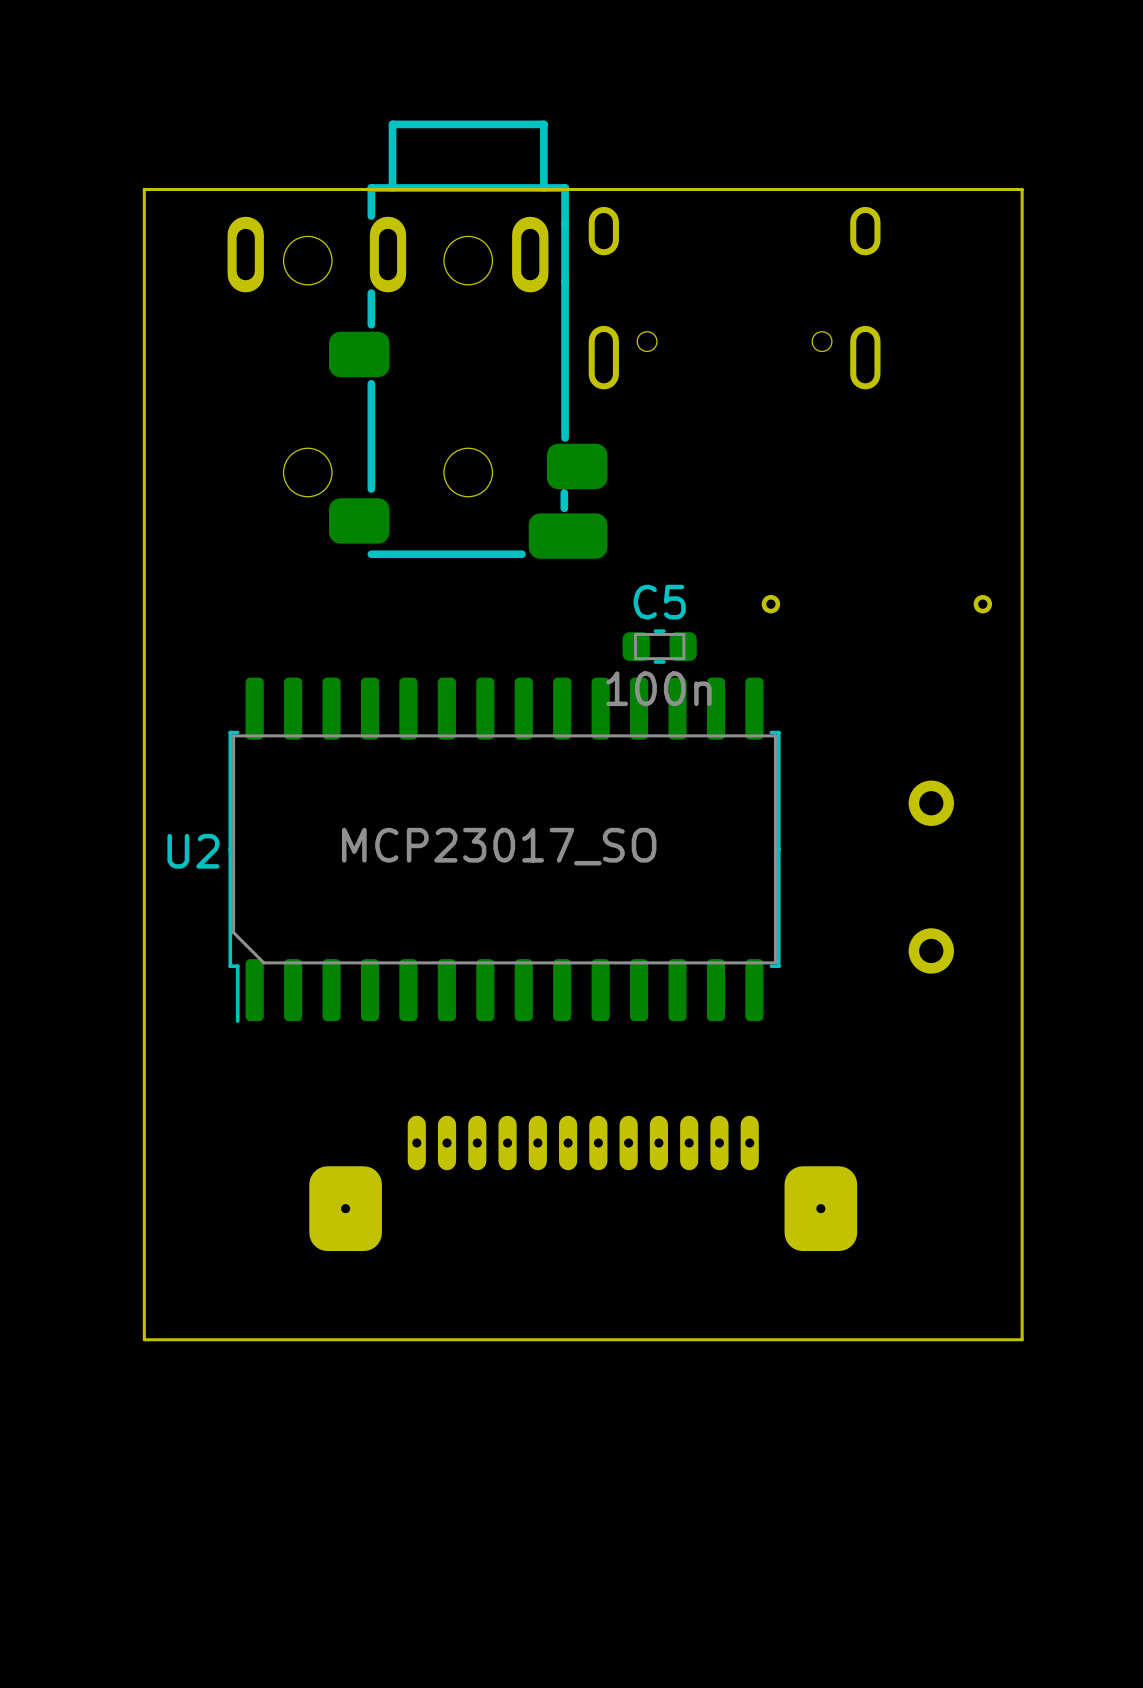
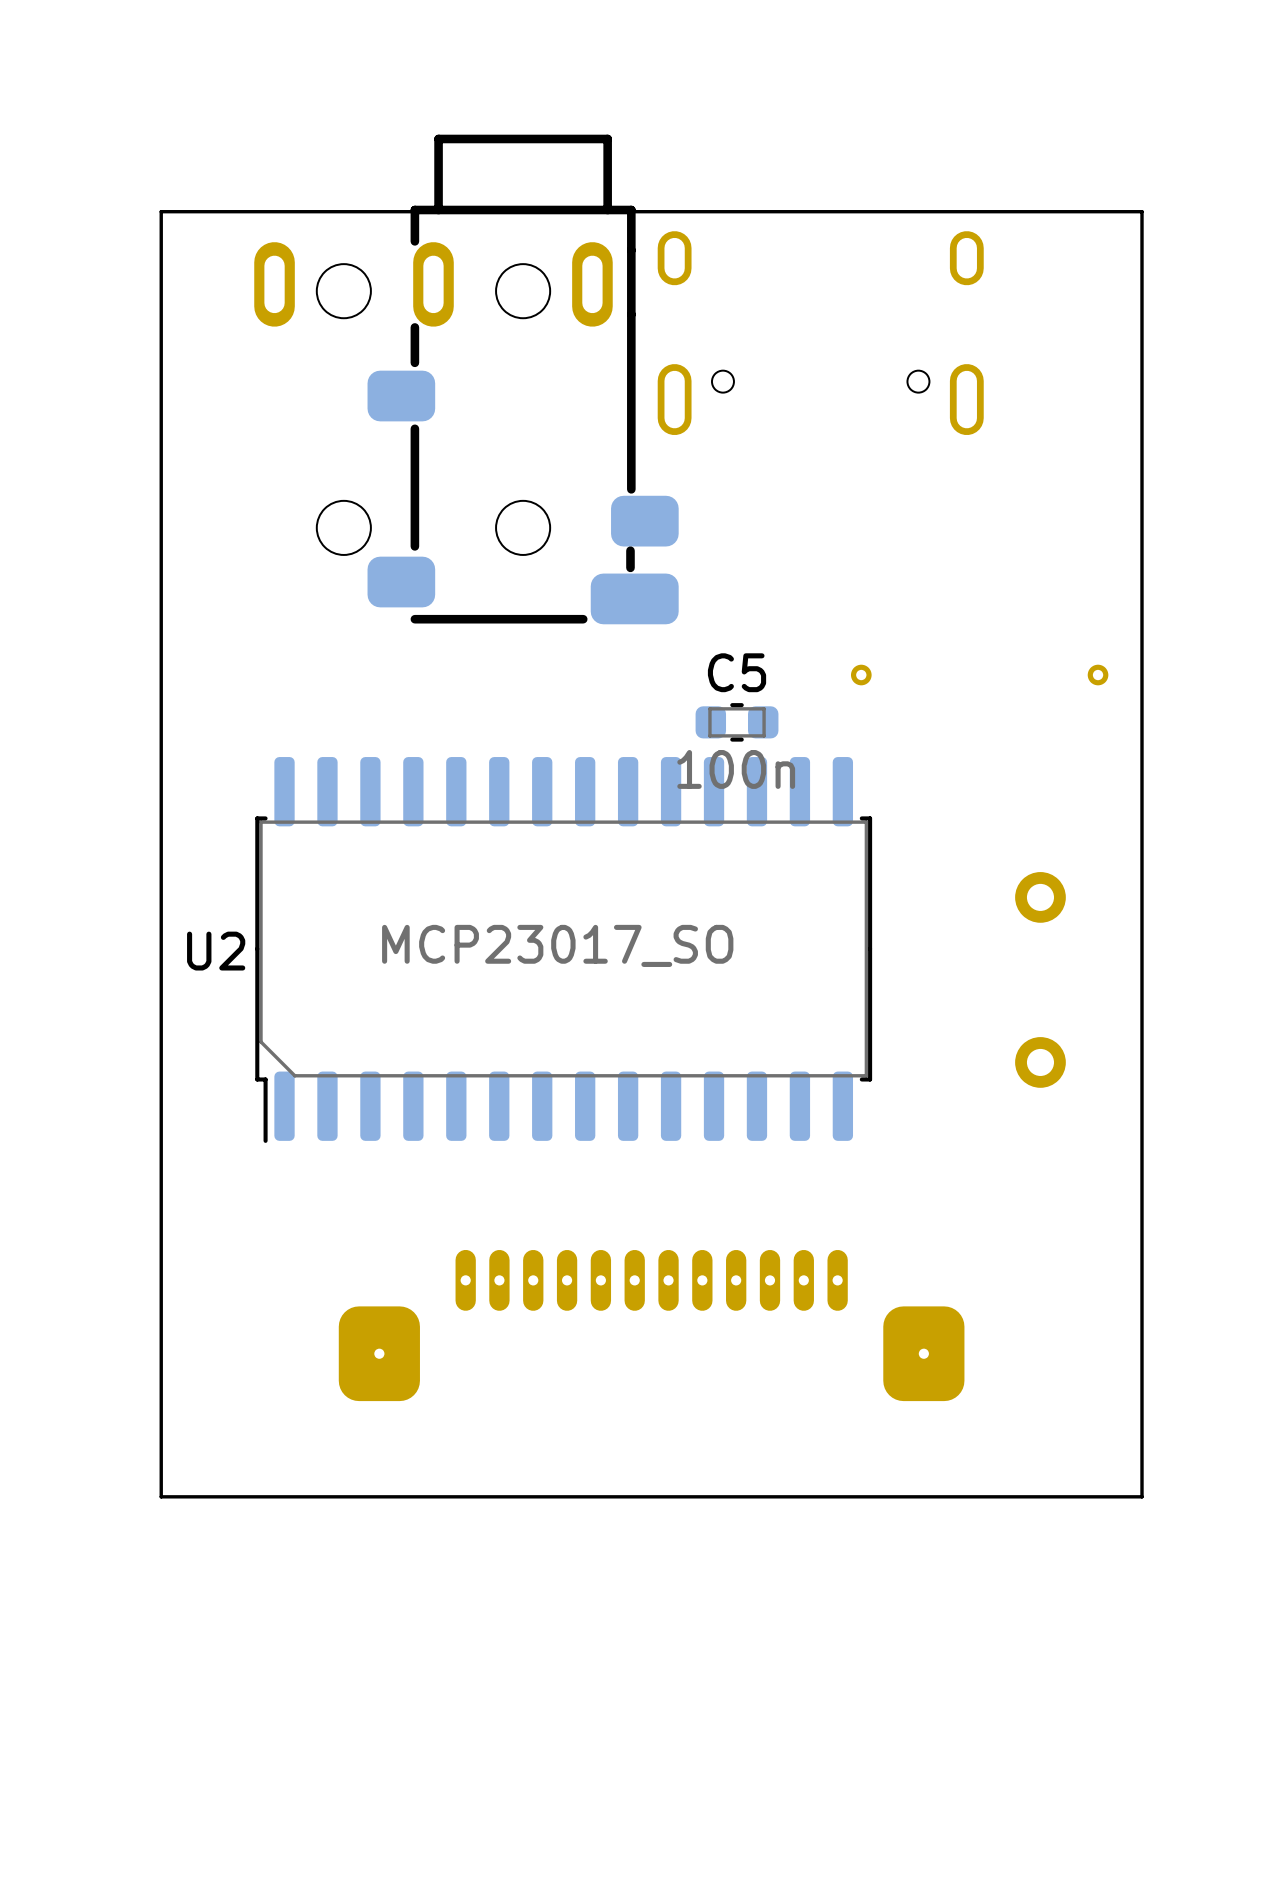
part footprint: [309, 1115, 858, 1252] -> [338, 1249, 965, 1402]

